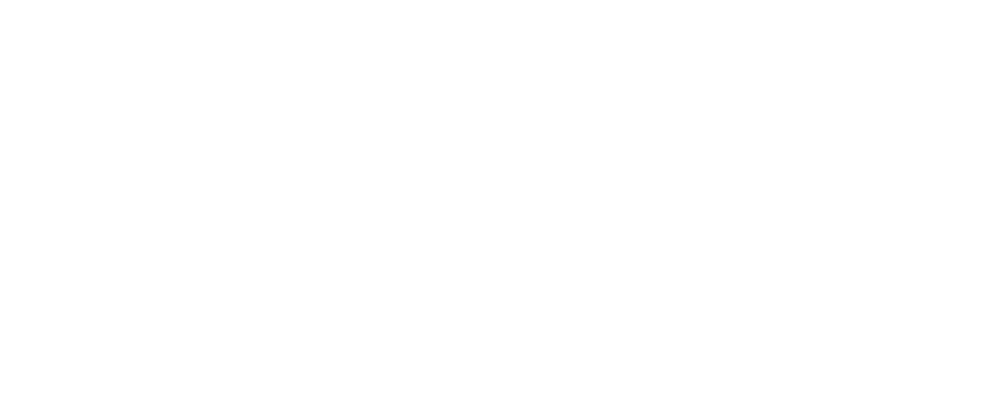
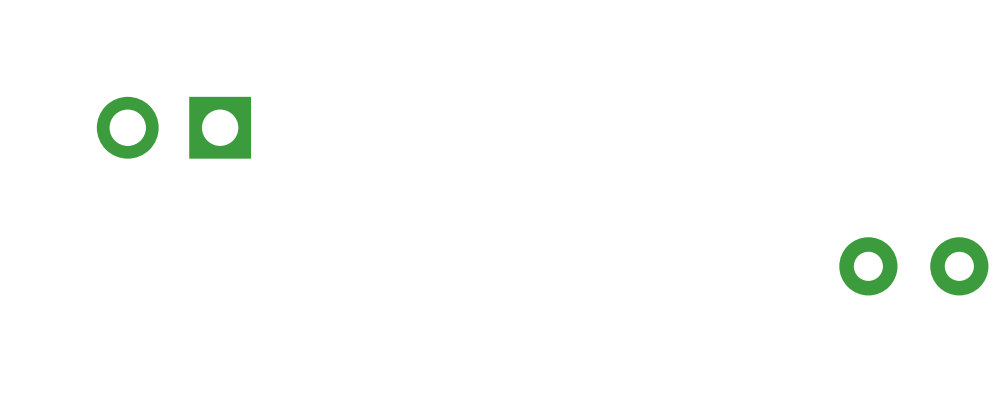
part: none -> (173, 127)
part: none -> (913, 266)

